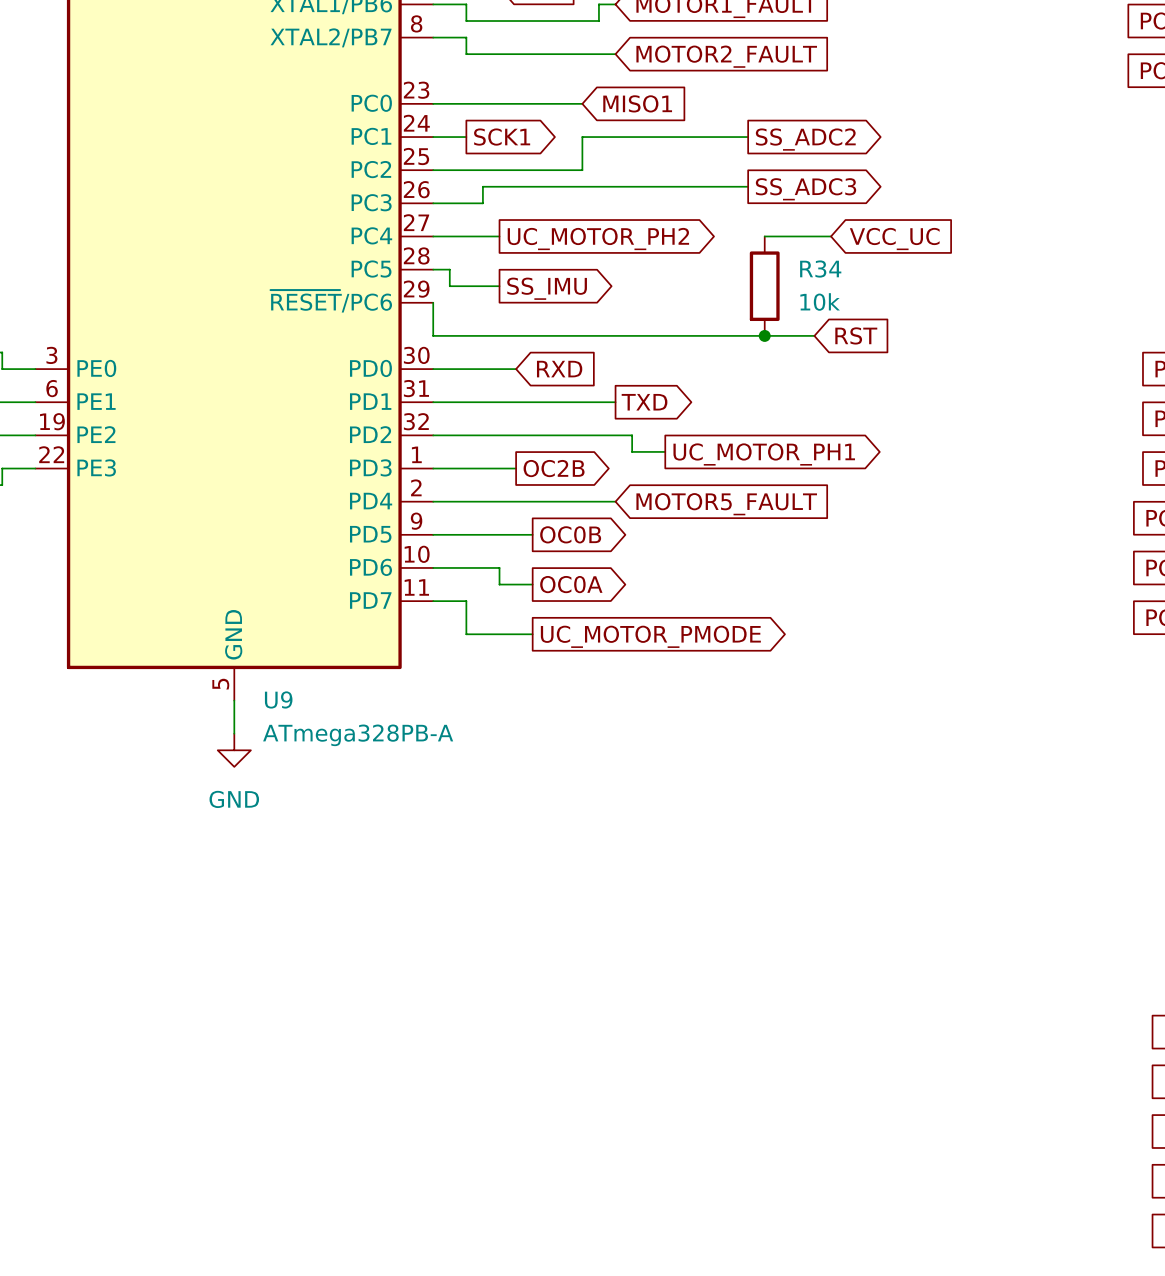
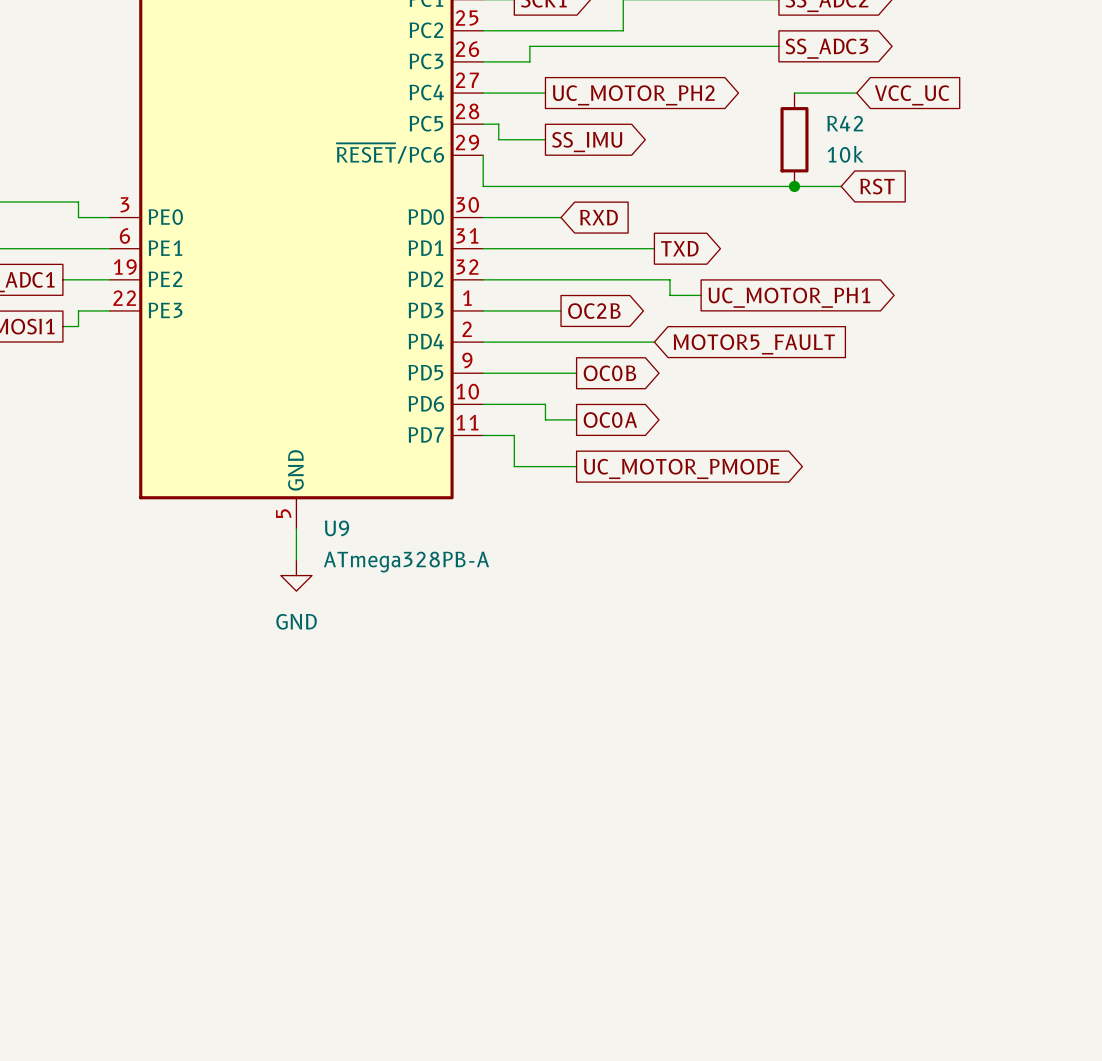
R34 name: R34 (820, 269) -> R42 (845, 123)

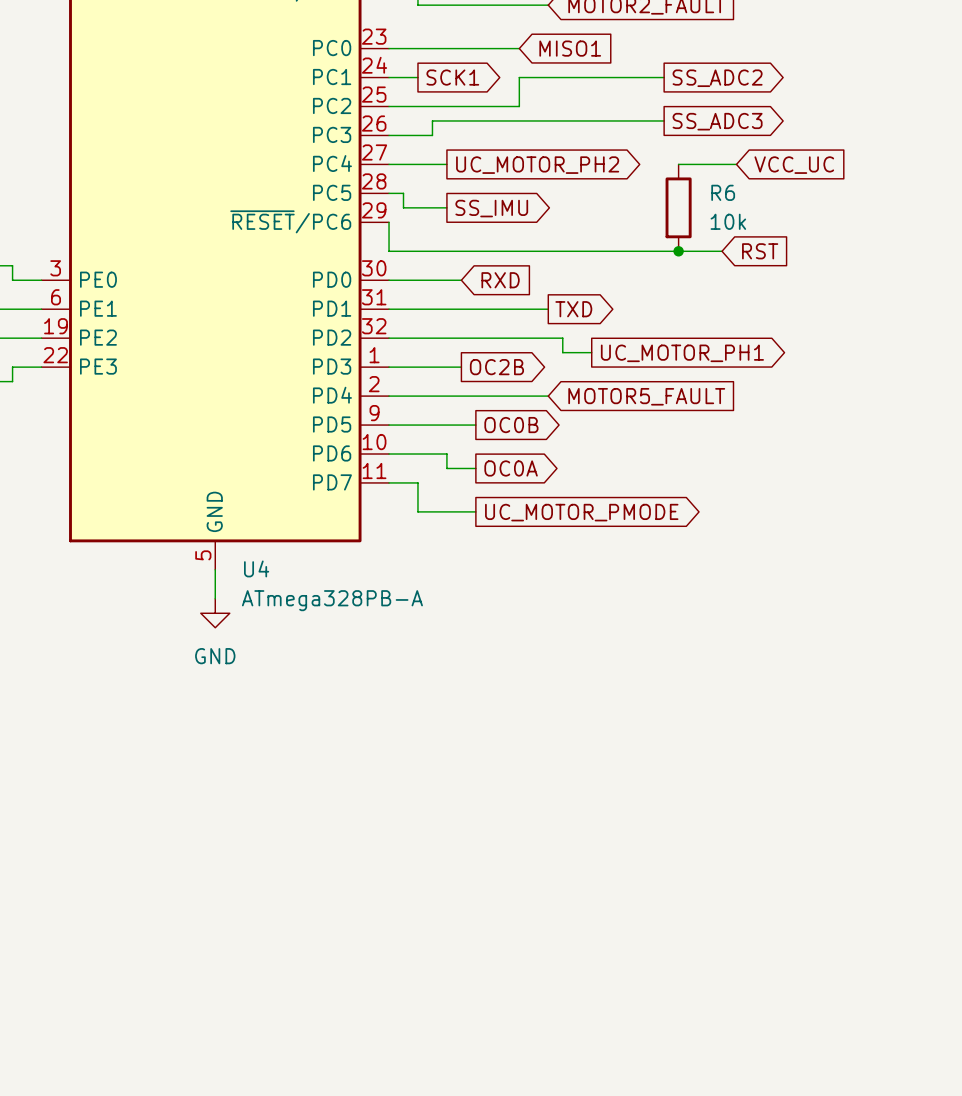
R42 name: R42 (845, 123) -> R6 (723, 192)
U9 name: U9 (336, 528) -> U4 (256, 568)

